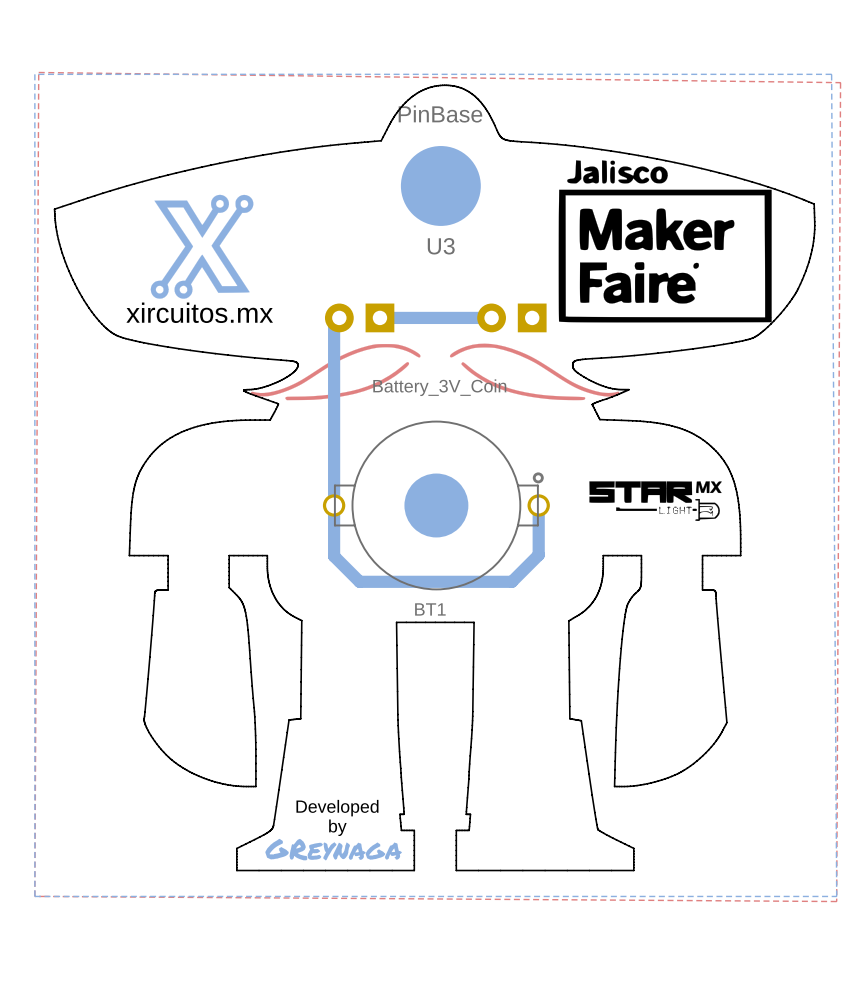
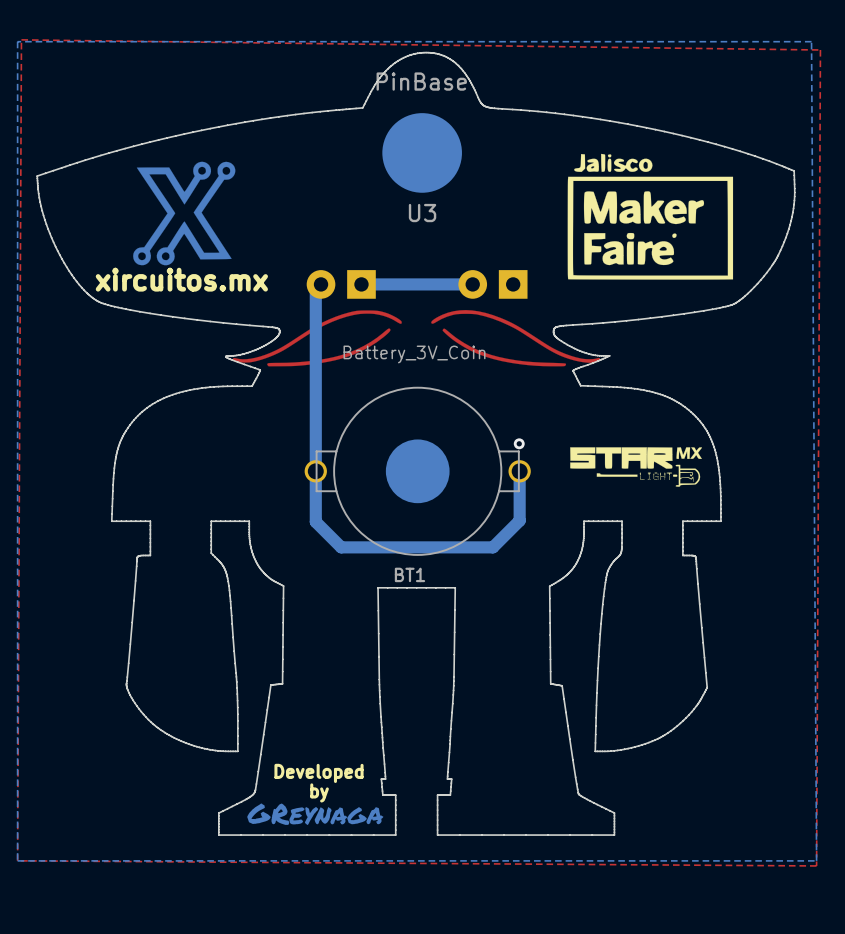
drawing shape: [558, 160, 772, 323] -> [567, 153, 734, 280]

